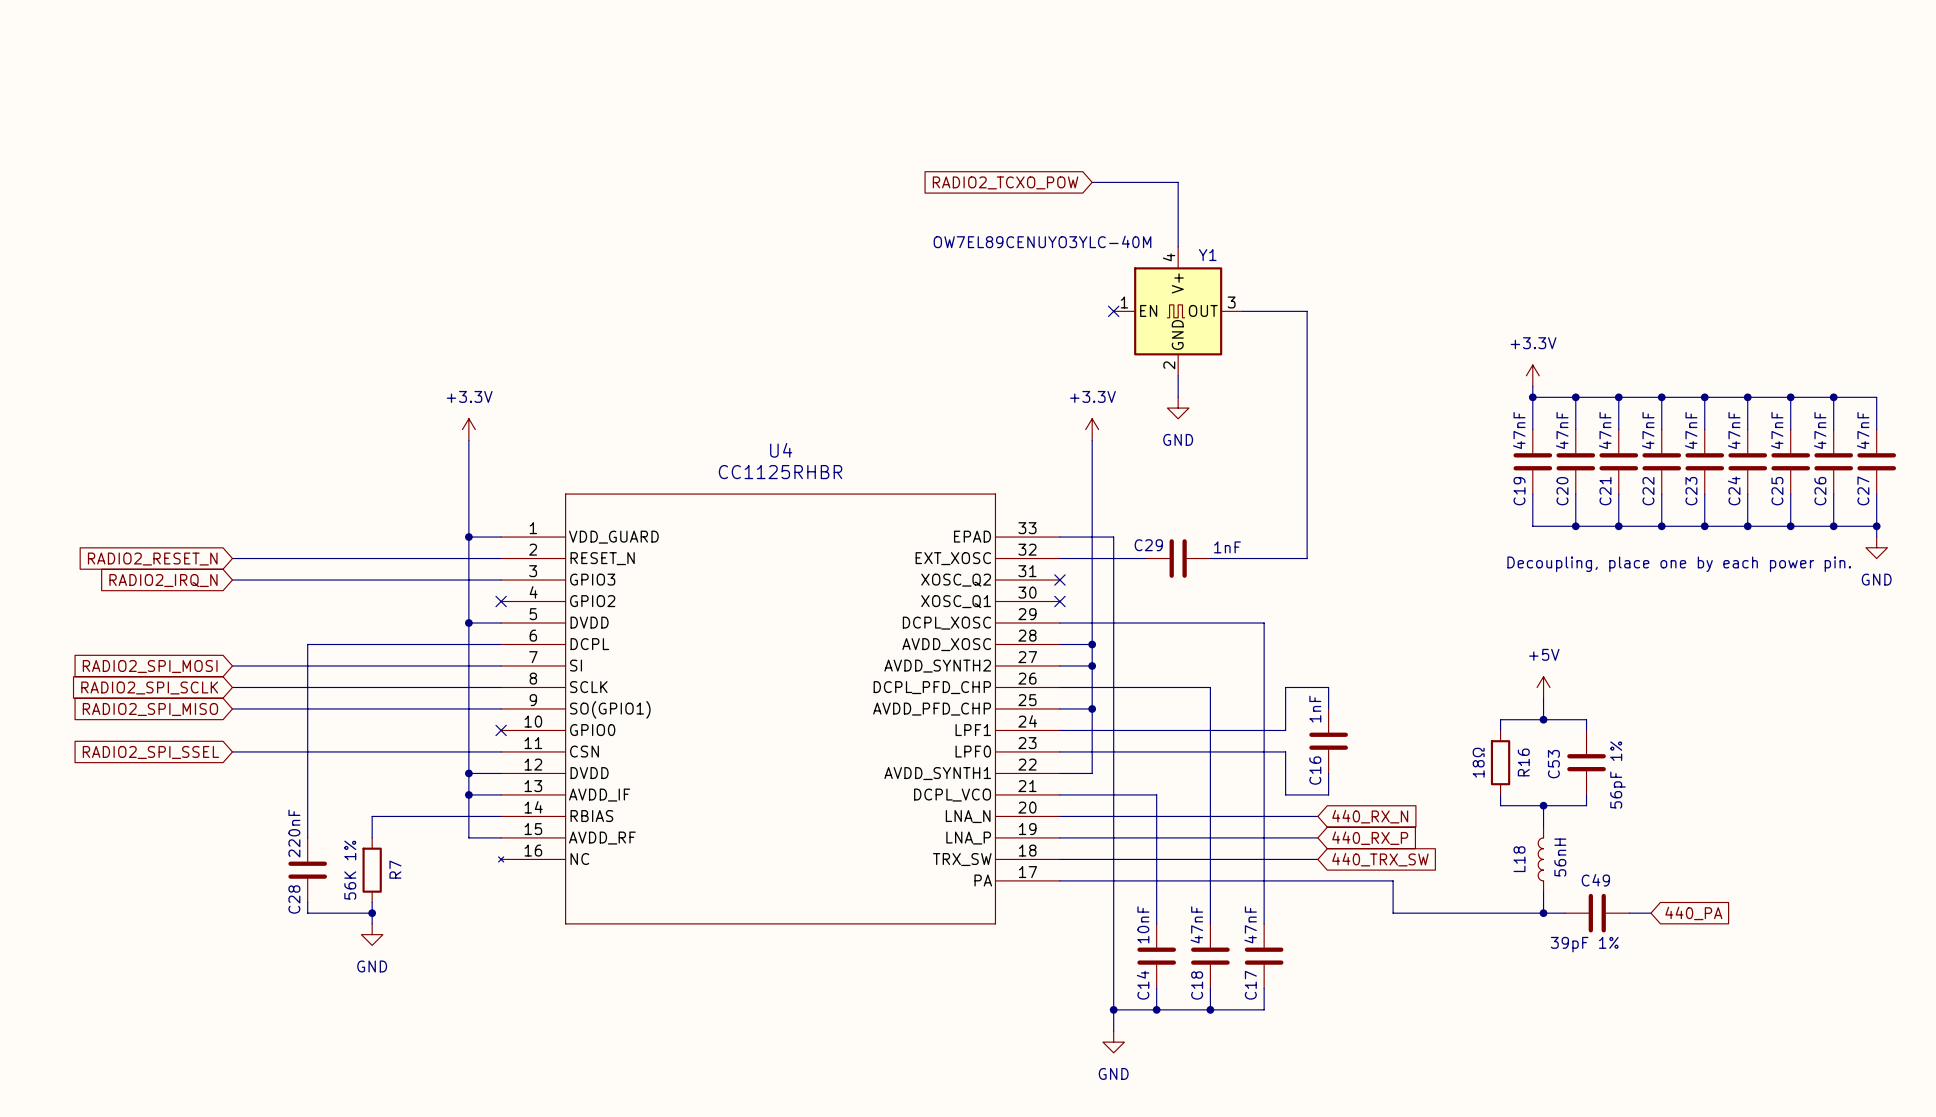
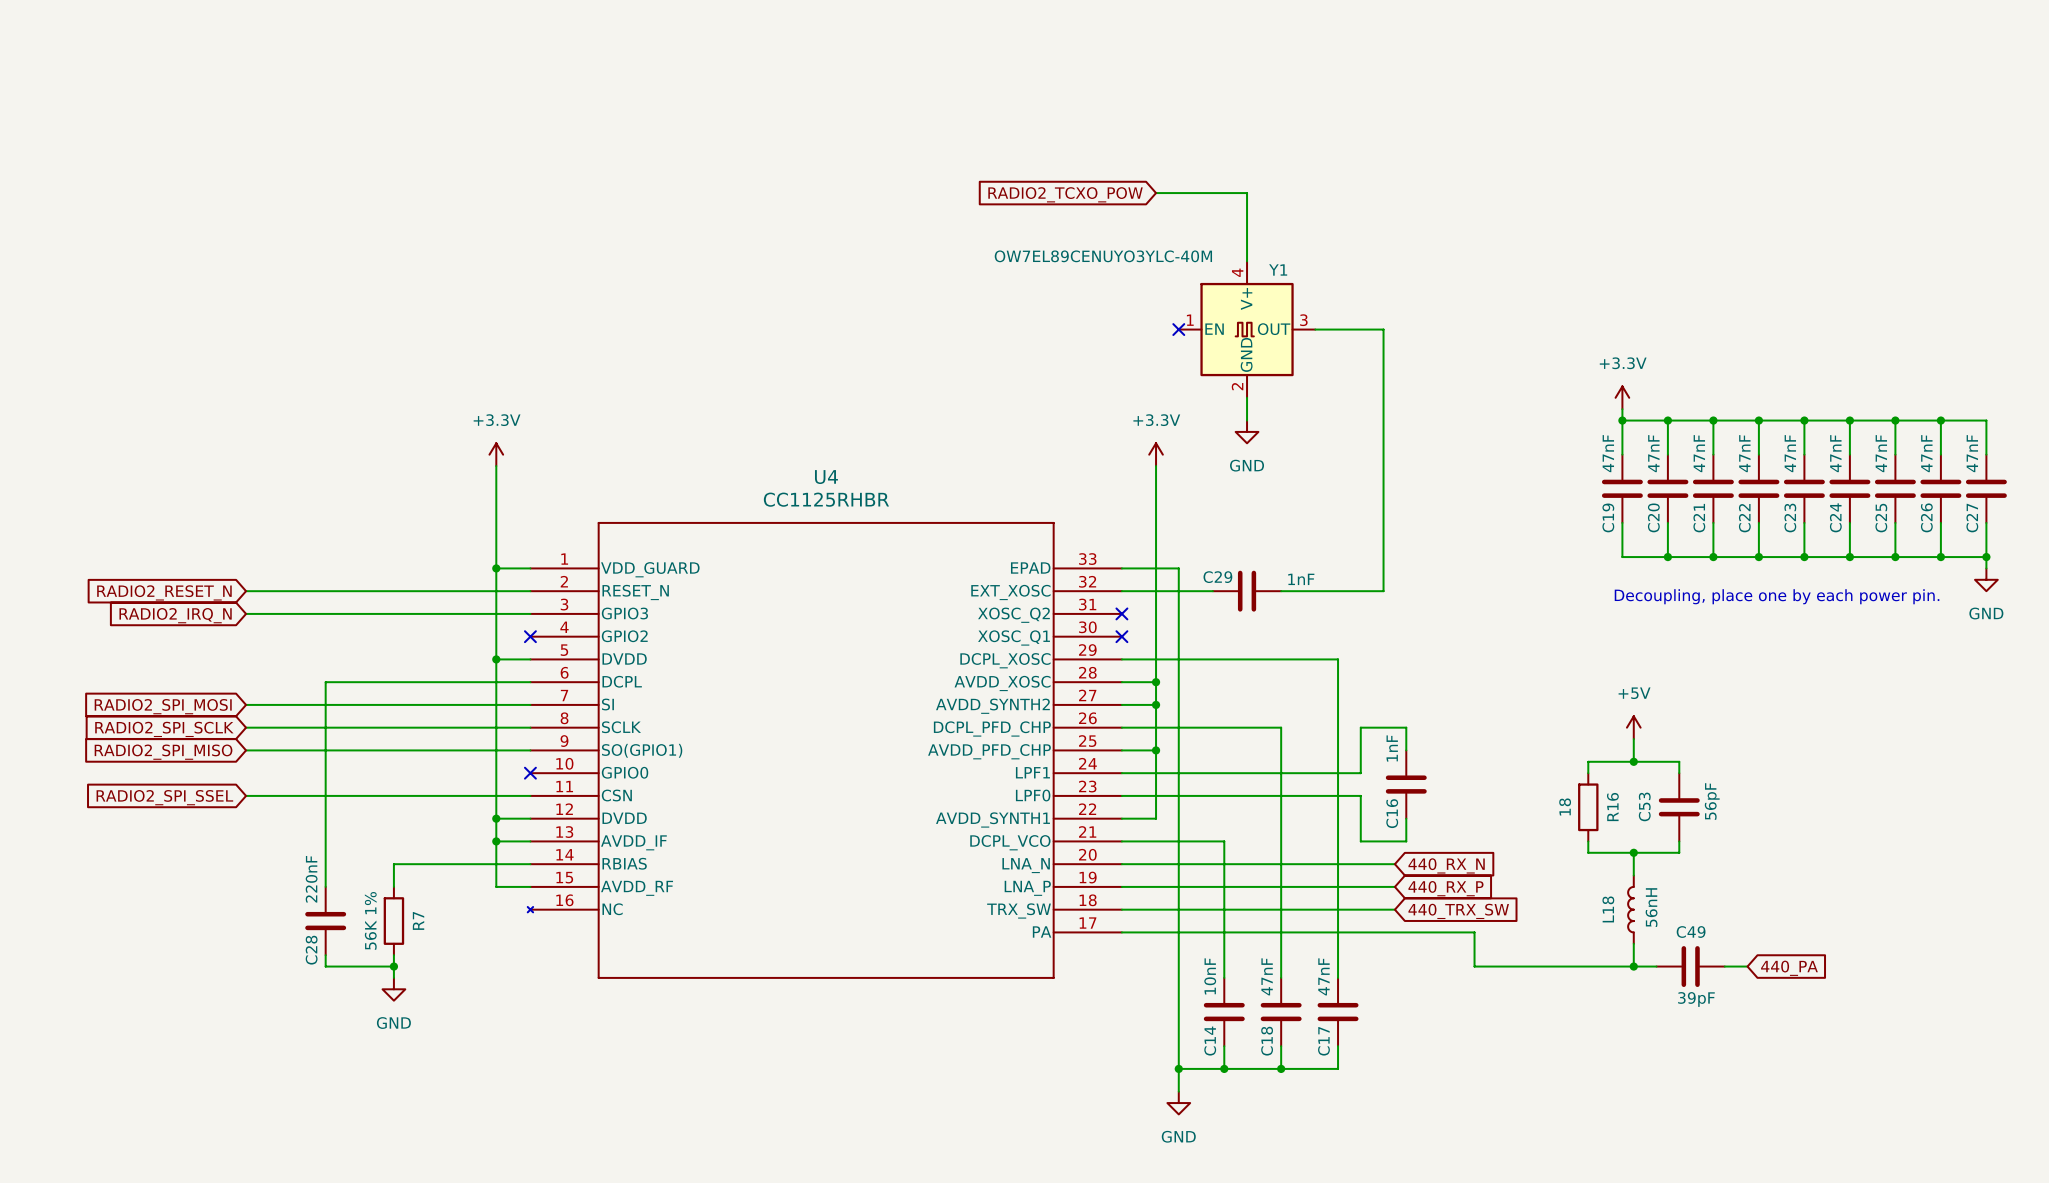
R16 value: 18Ω (1478, 762) -> 18 (1565, 806)
C53 value: 56pF 1% (1618, 774) -> 56pF (1712, 801)
C49 value: 39pF 1% (1584, 944) -> 39pF (1696, 999)

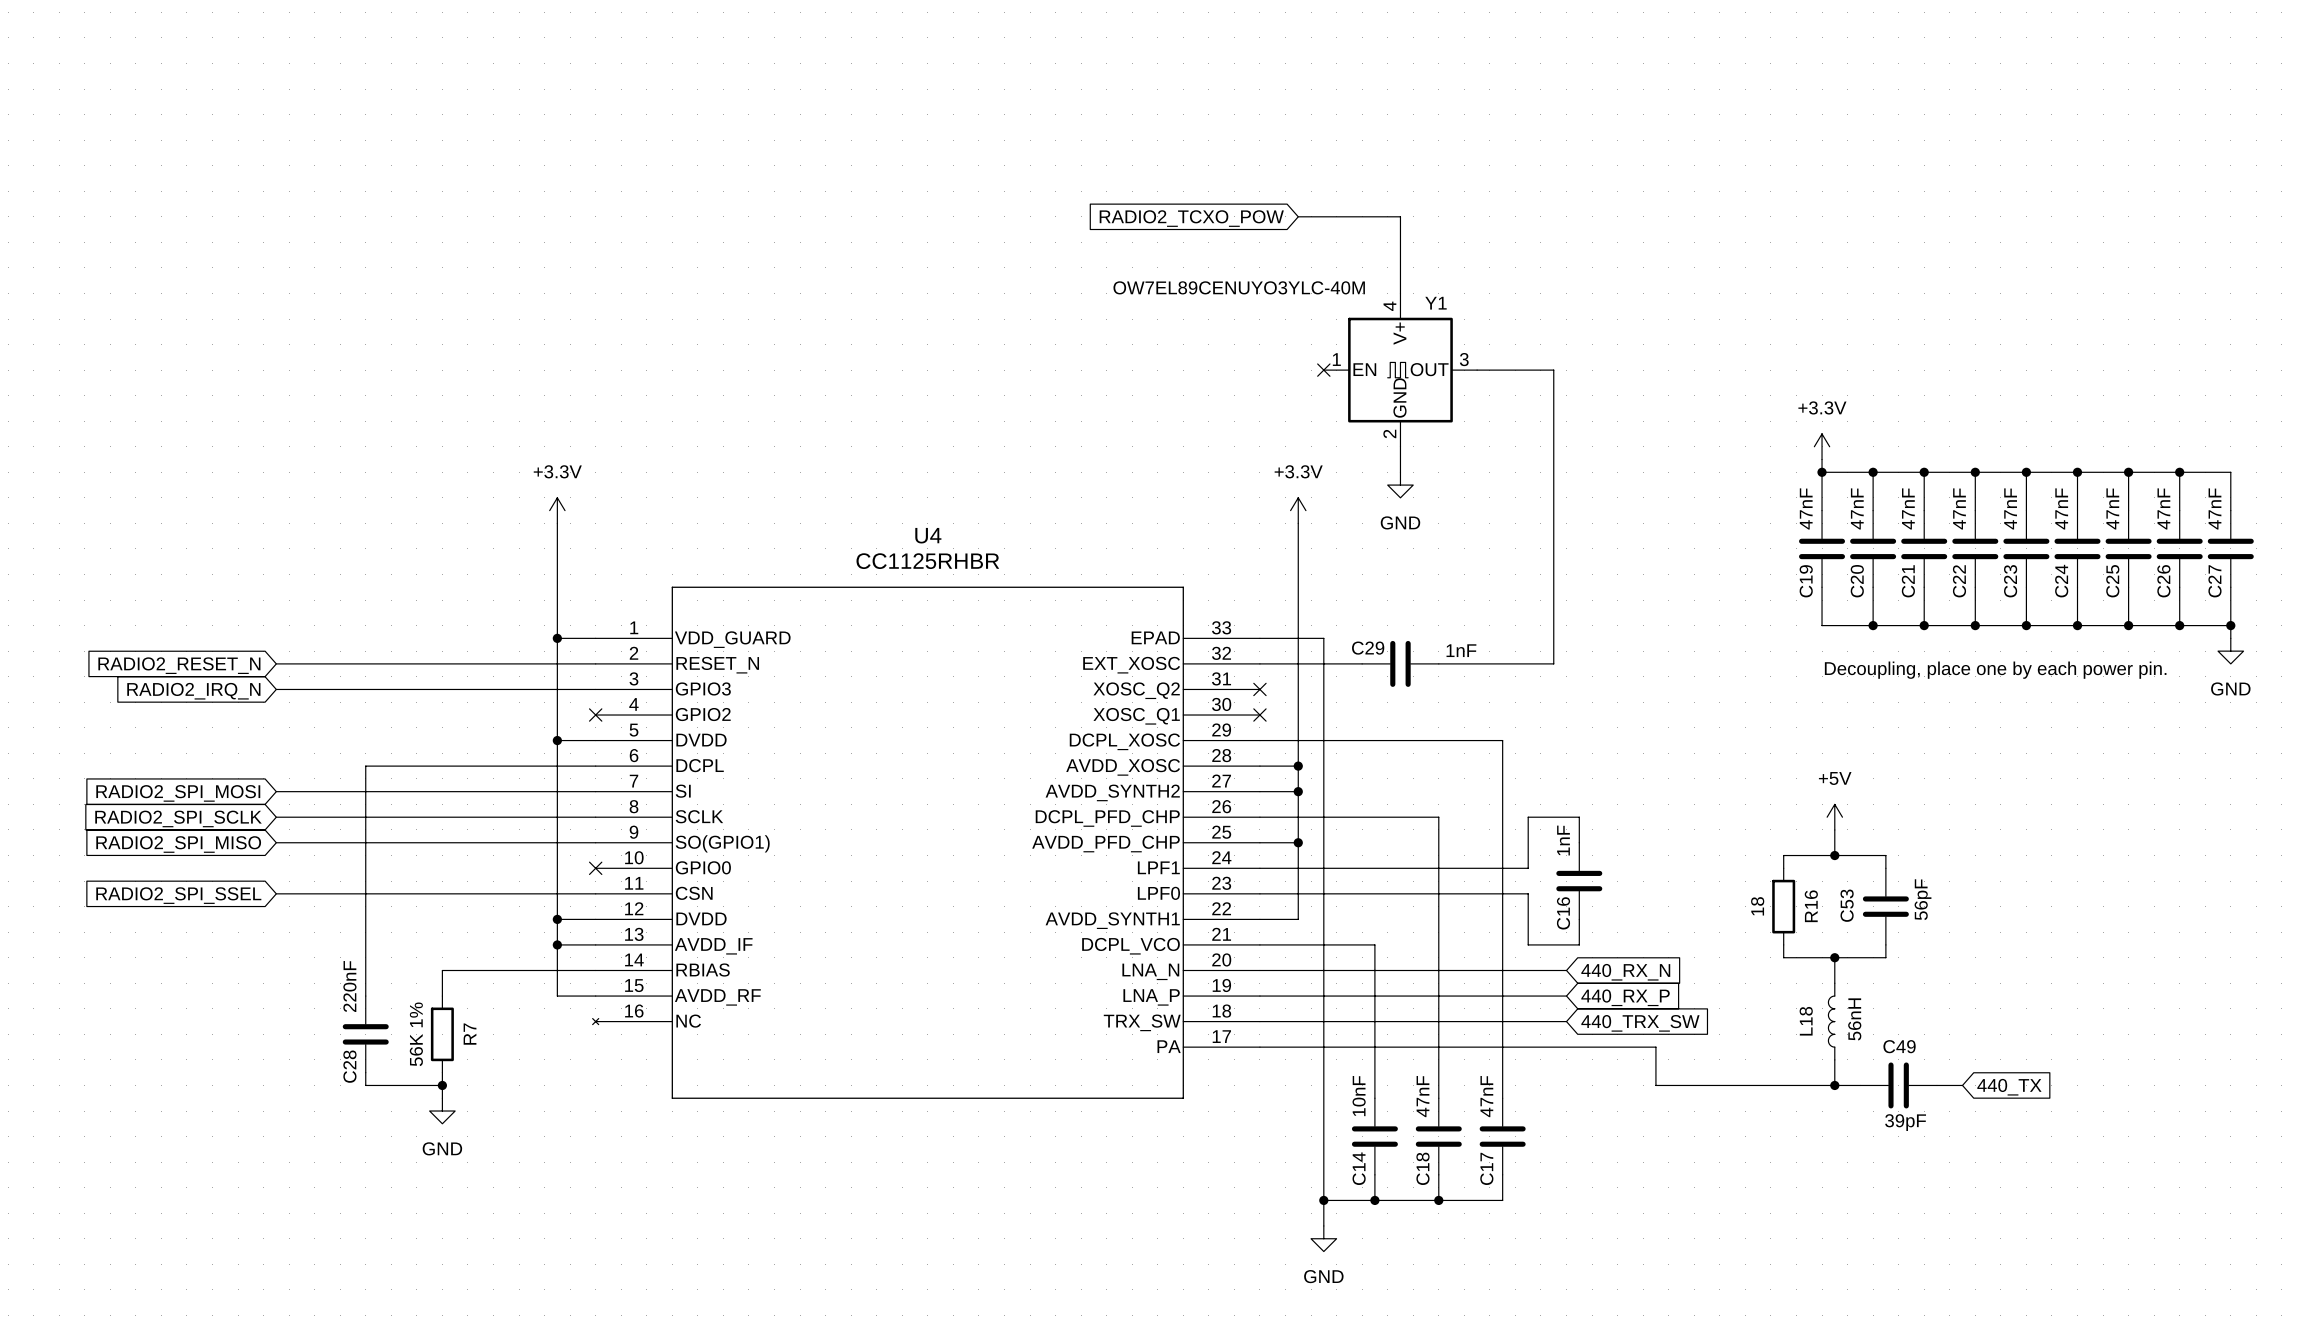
global label: 440_PA (1789, 968) -> 440_TX (2009, 1087)

